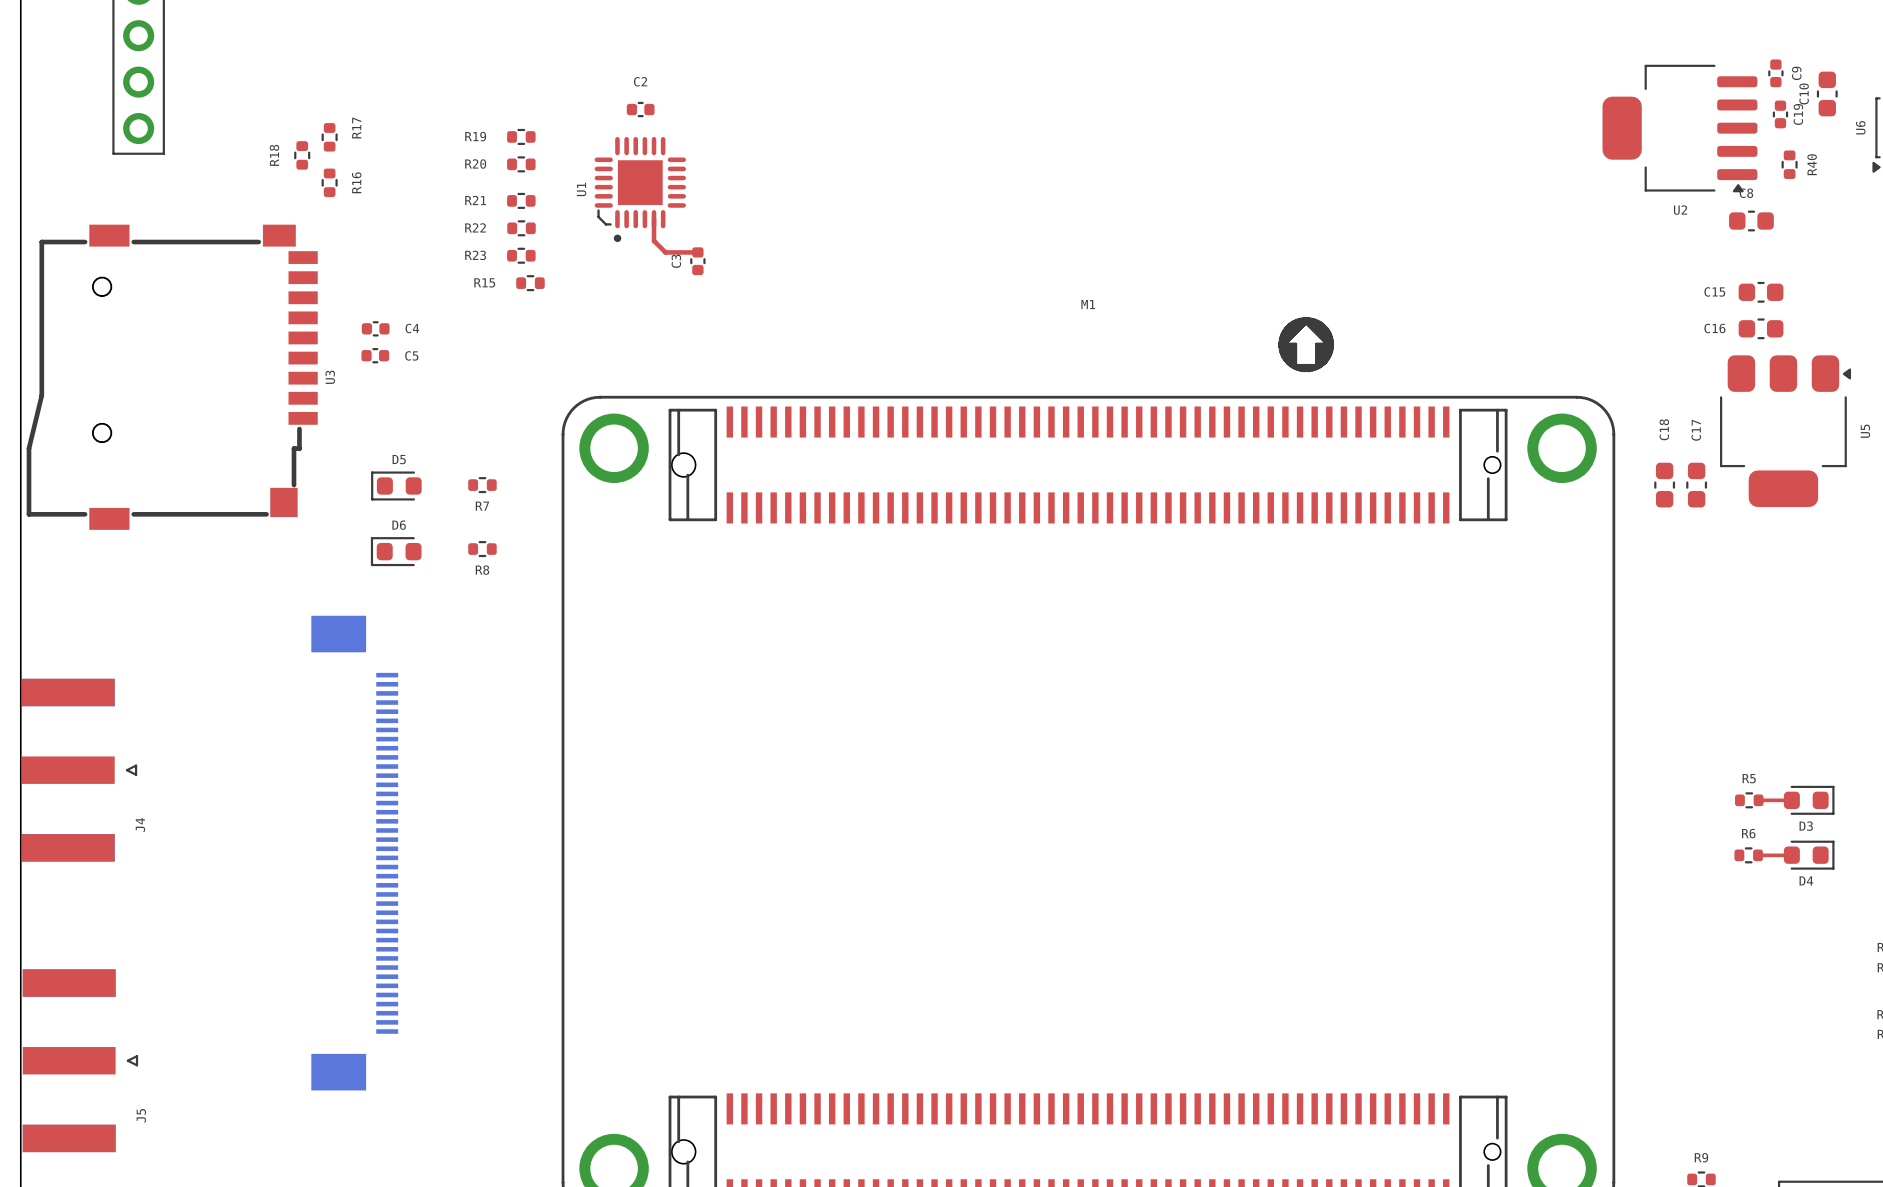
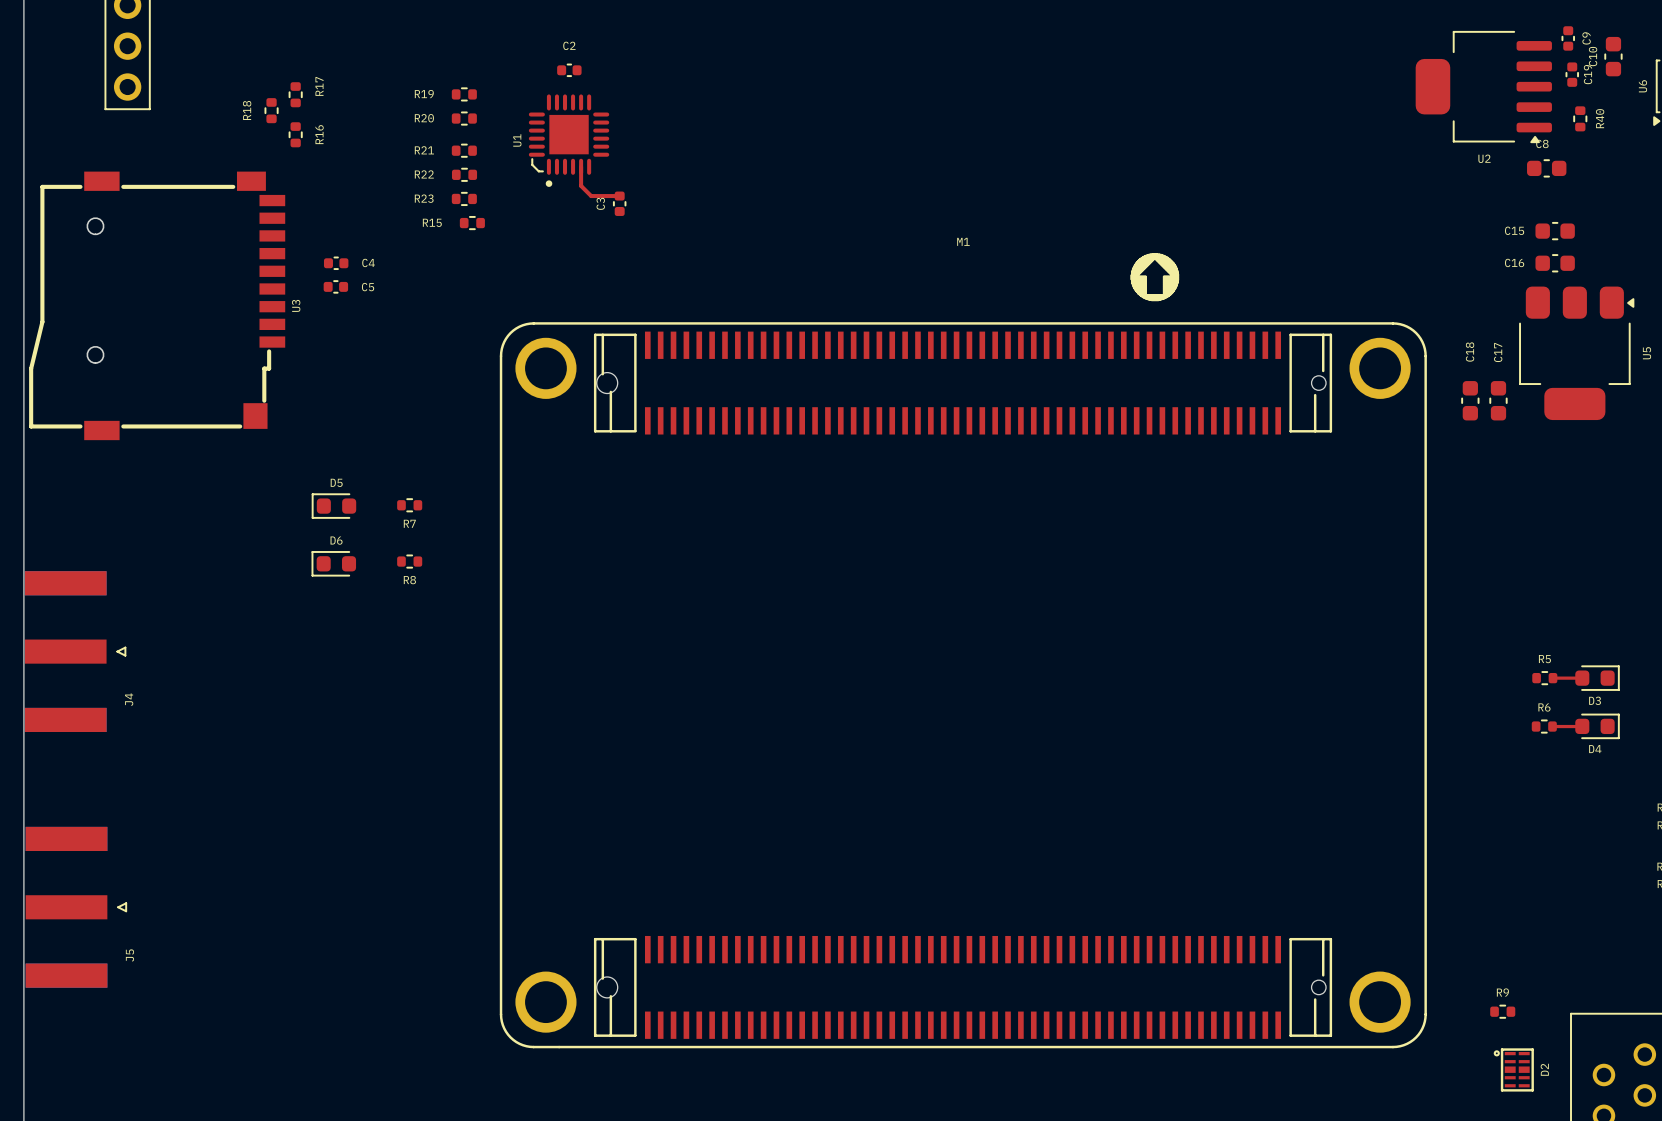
R7 position: (482, 485) -> (409, 505)
D5 position: (396, 486) -> (333, 506)
R8 position: (482, 549) -> (409, 561)
D6 position: (396, 551) -> (333, 563)
part: (354, 853) -> none

